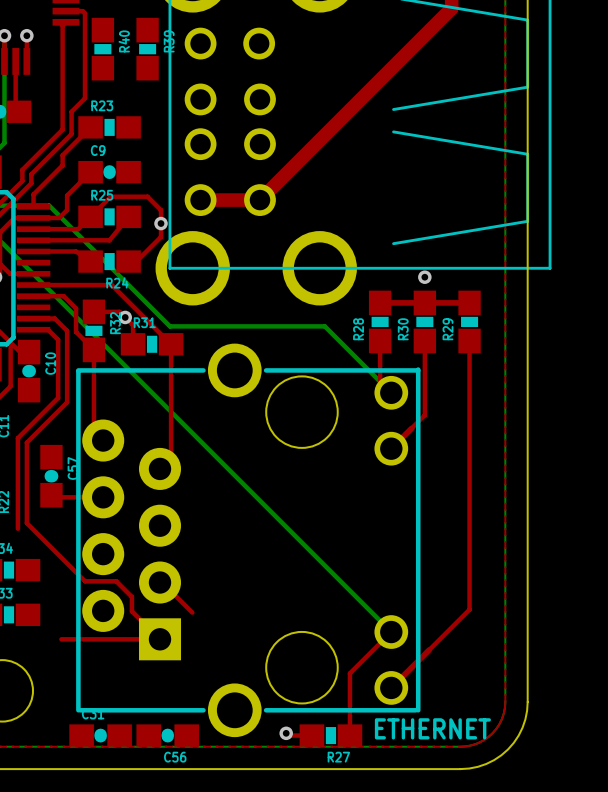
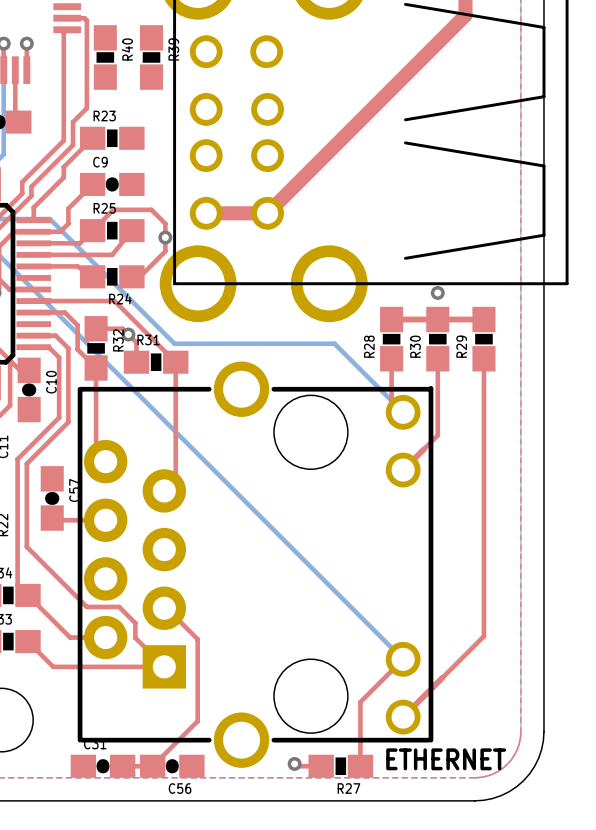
top track: none -> (17, 552) (17, 585) (70, 637) (105, 637)
top track: none -> (197, 639) (197, 721) (152, 766) (122, 766)
top track: none -> (27, 641) (53, 666) (62, 666)

